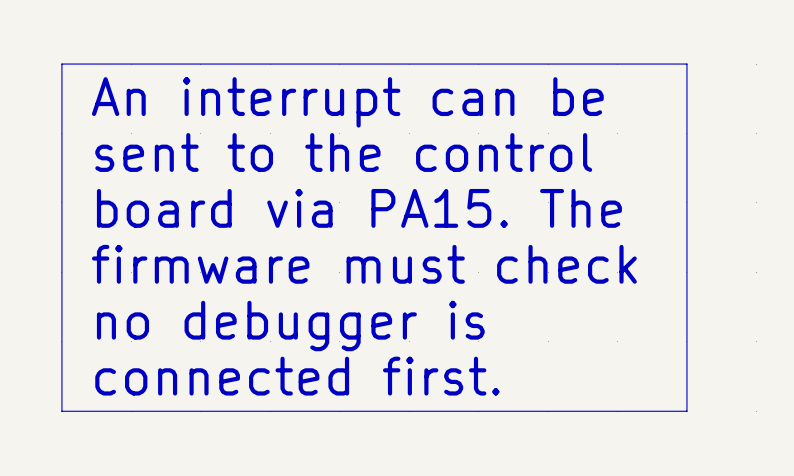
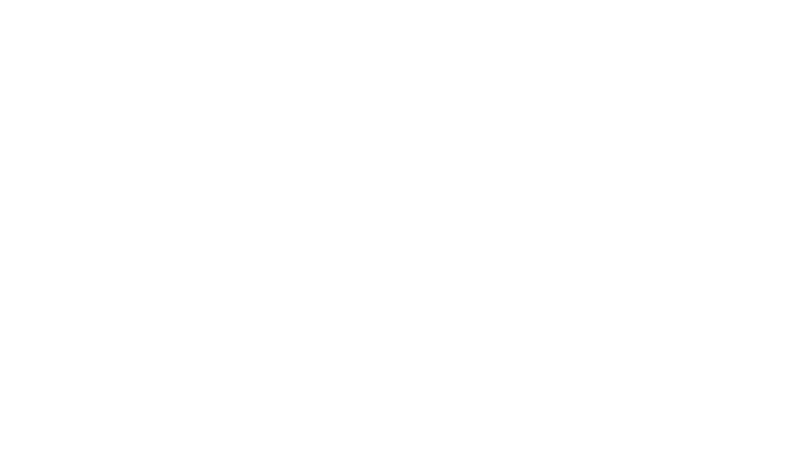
line: (61, 64) (686, 64) (686, 411) (61, 411) (61, 64) -> none
text: An interrupt can be (347, 102) -> none
text: sent to the control (343, 152) -> none
text: board via PA15. The (359, 208) -> none
text: firmware must check (364, 264) -> none
text: no debugger is (290, 325) -> none
text: connected first. (297, 376) -> none

